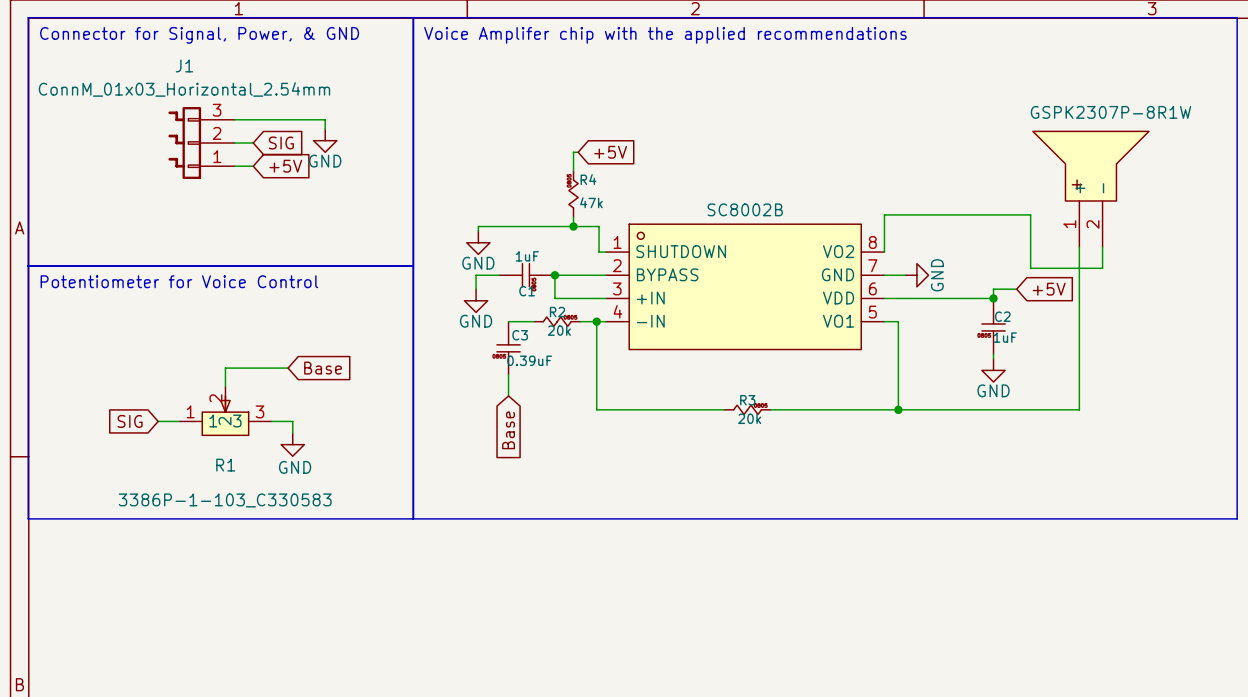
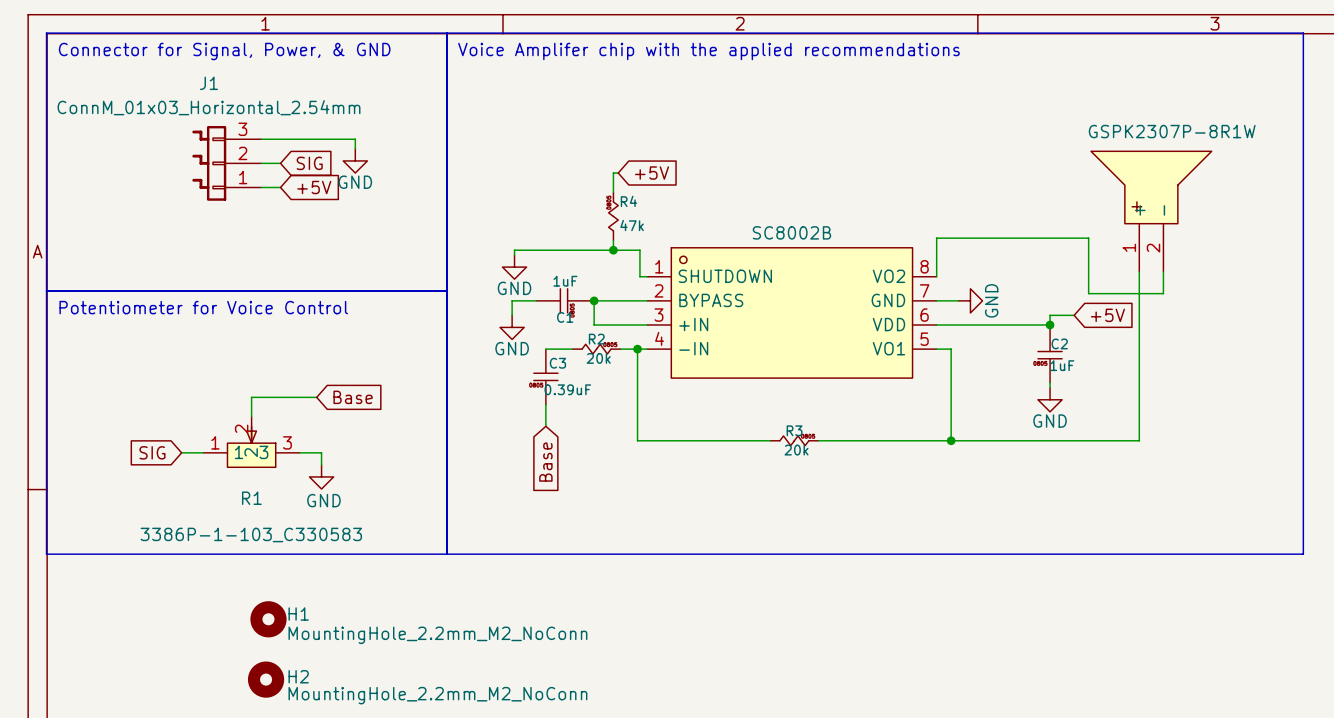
H1: none -> MountingHole_2.2mm_M2_NoConn (268, 619)
H2: none -> MountingHole_2.2mm_M2_NoConn (266, 679)

